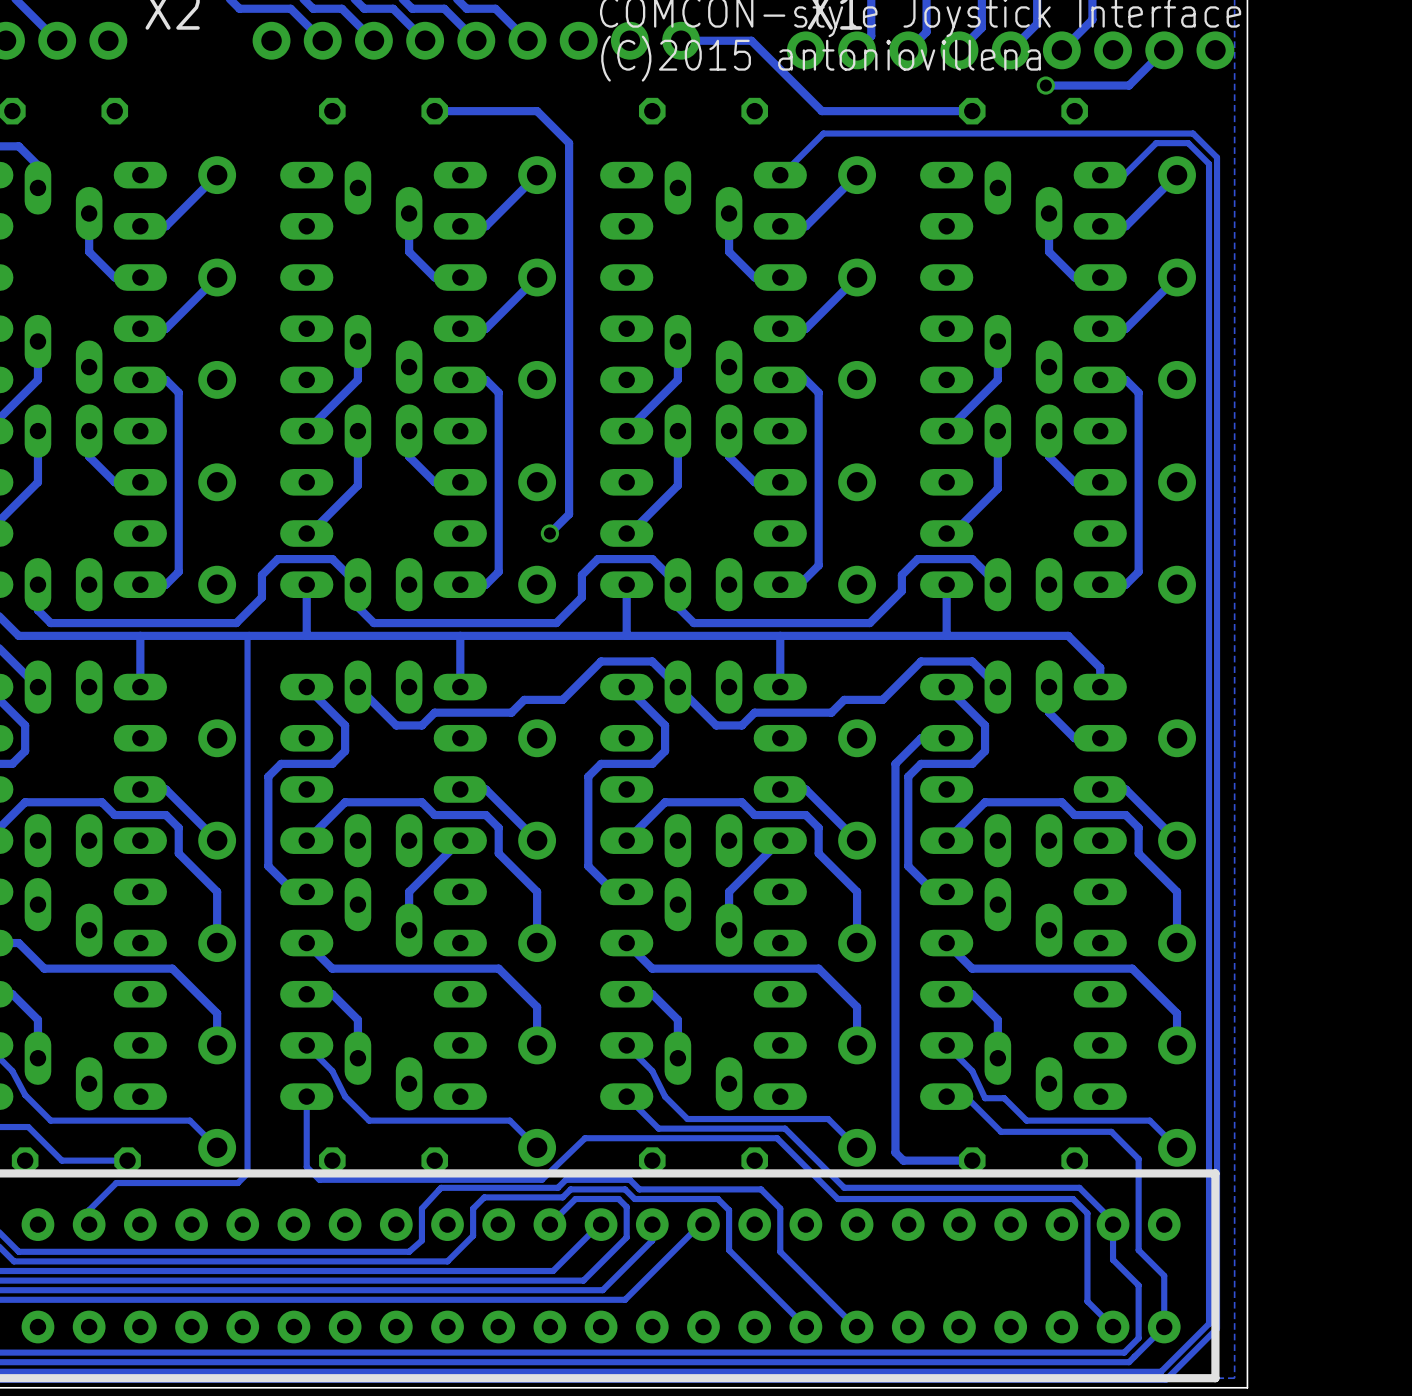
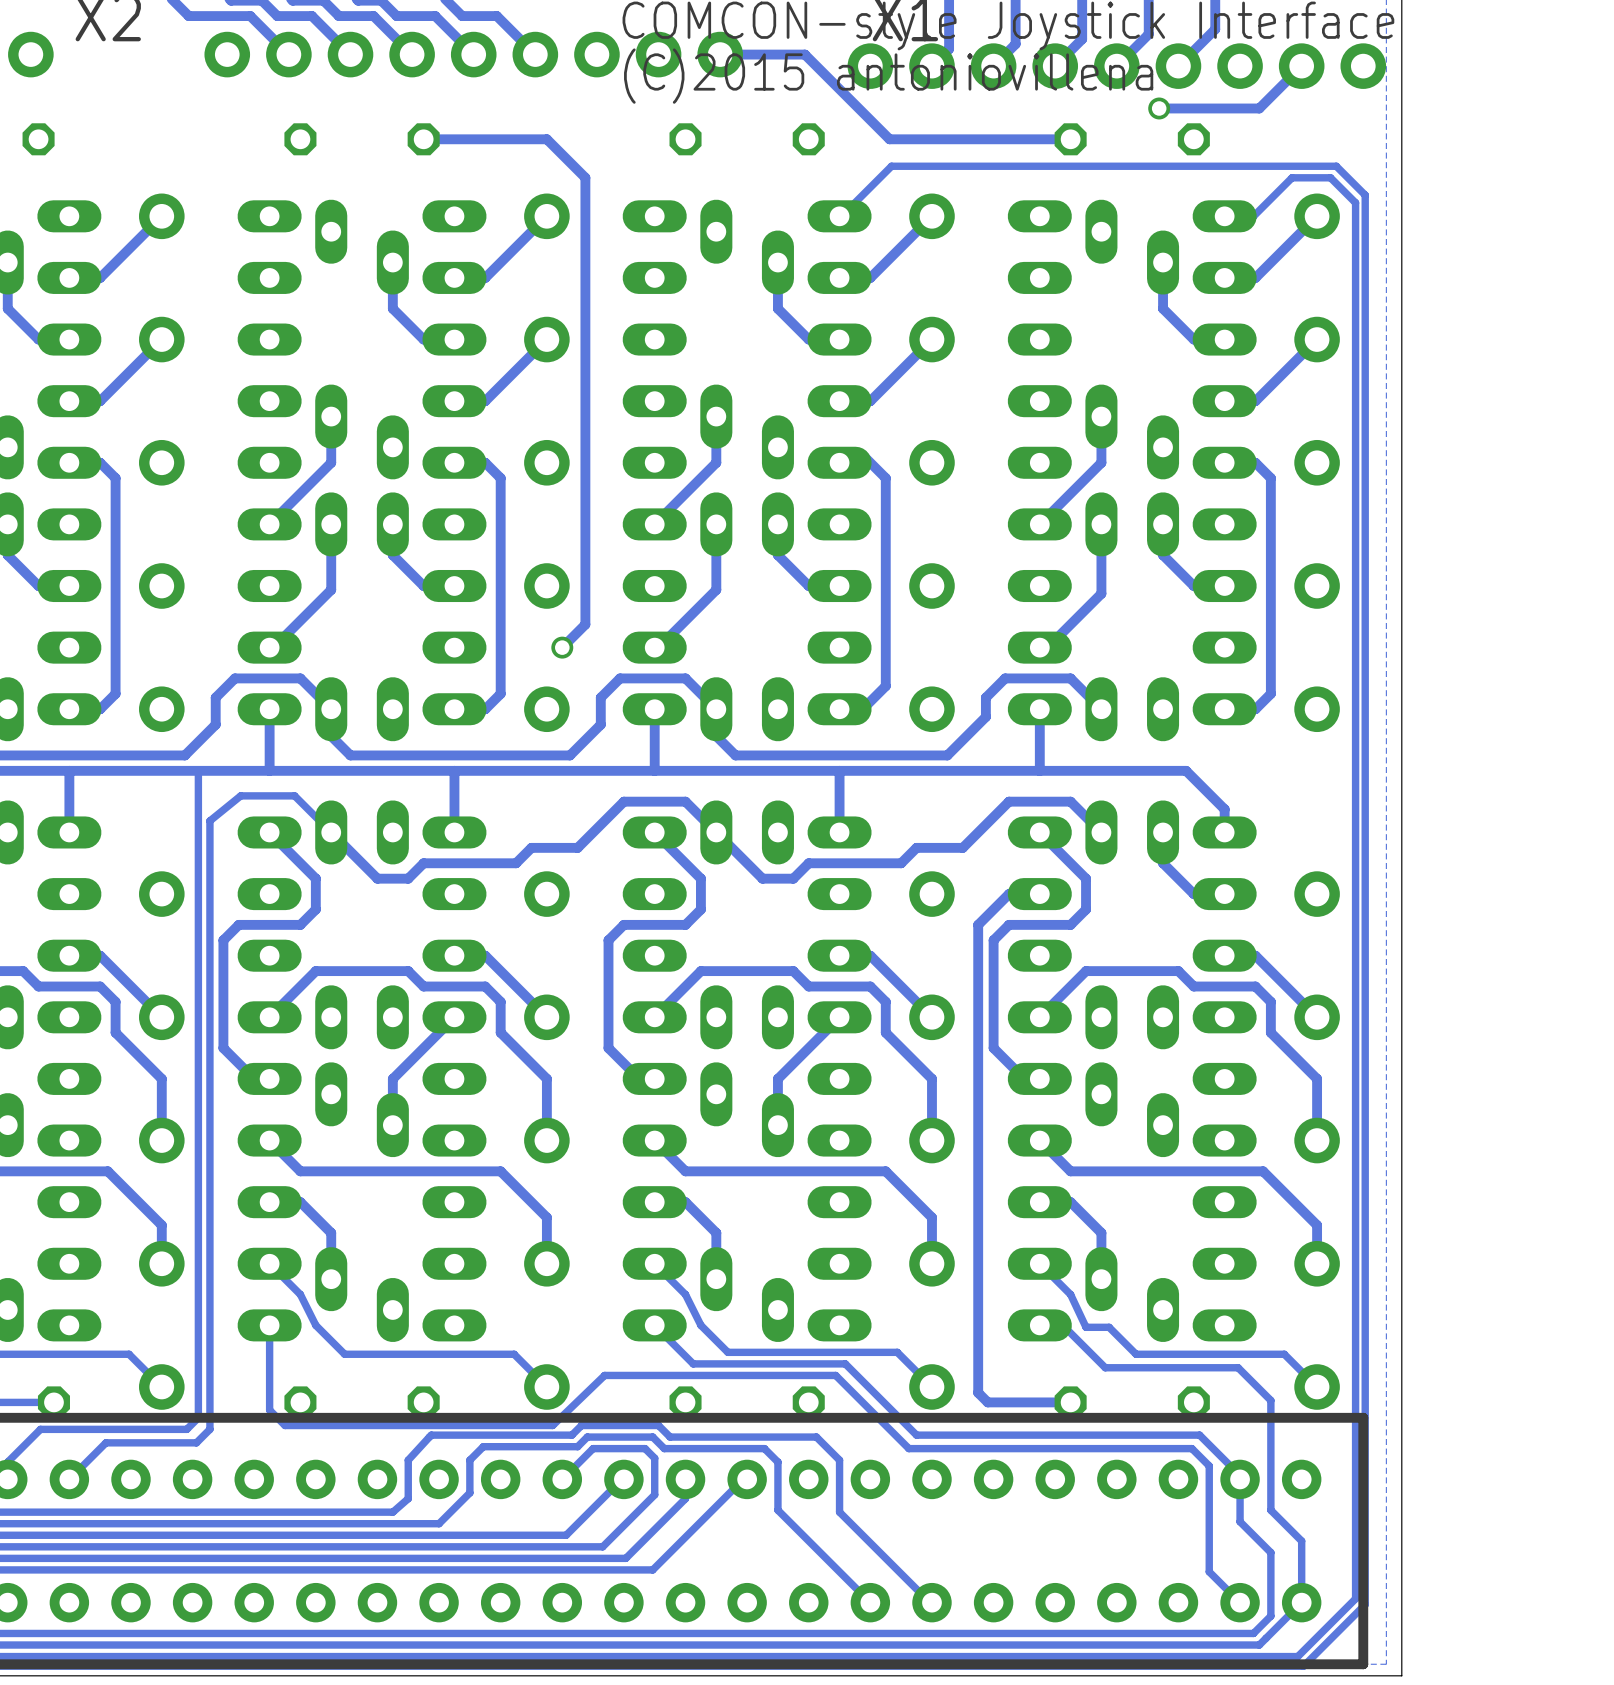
track: none -> (331, 832) (294, 795) (240, 795) (209, 820) (209, 1429) (196, 1442) (105, 1442) (69, 1479)

